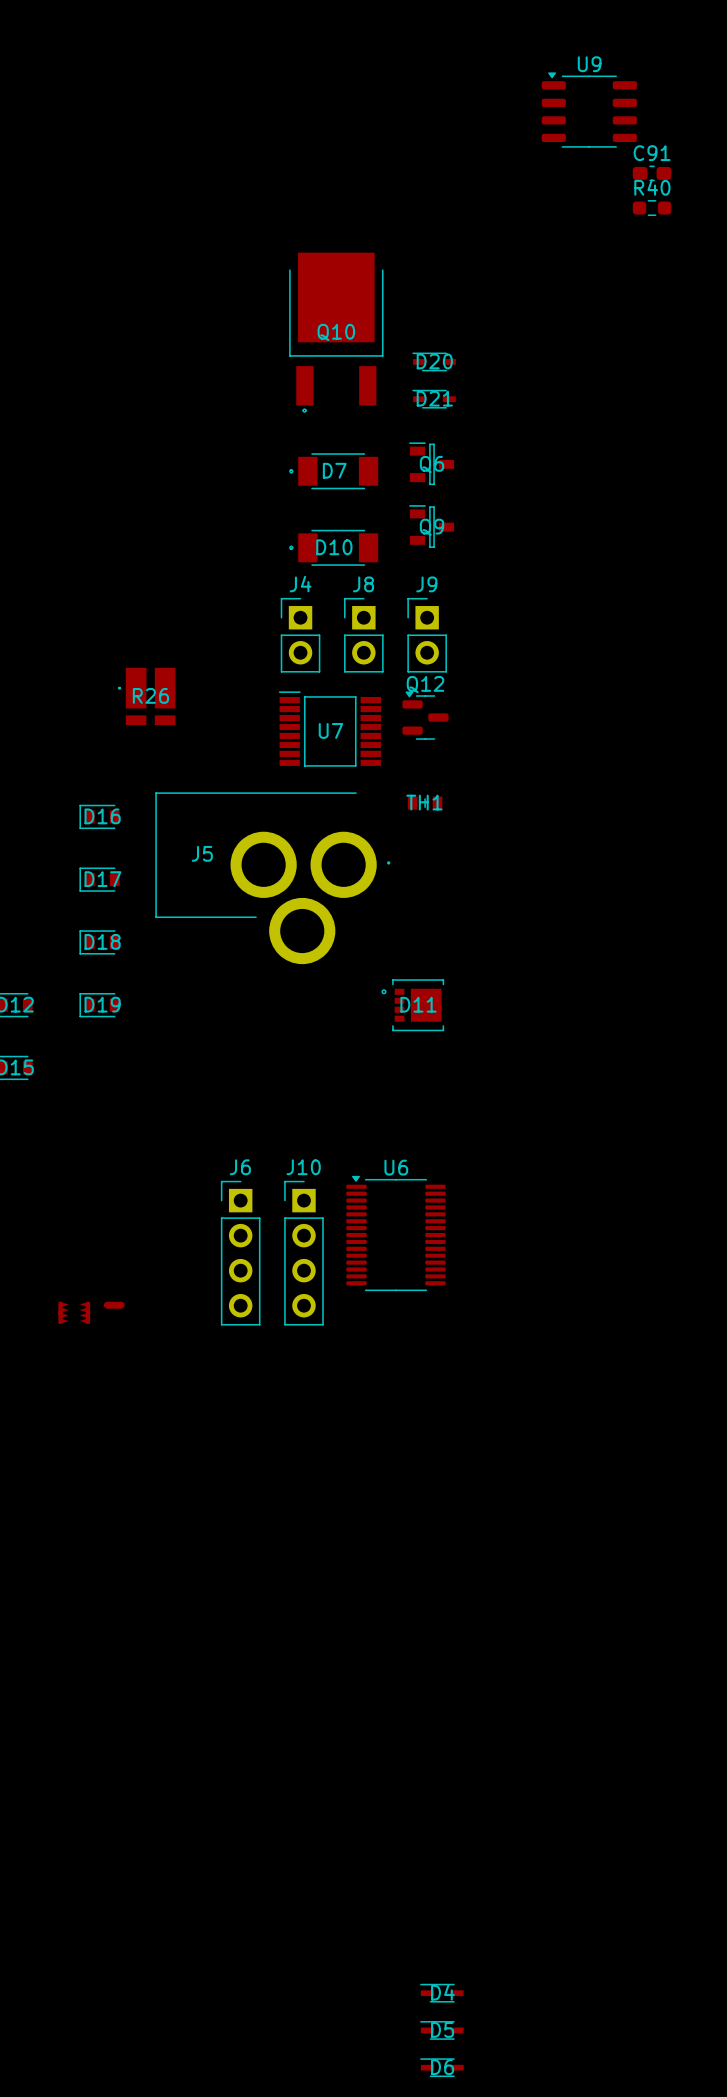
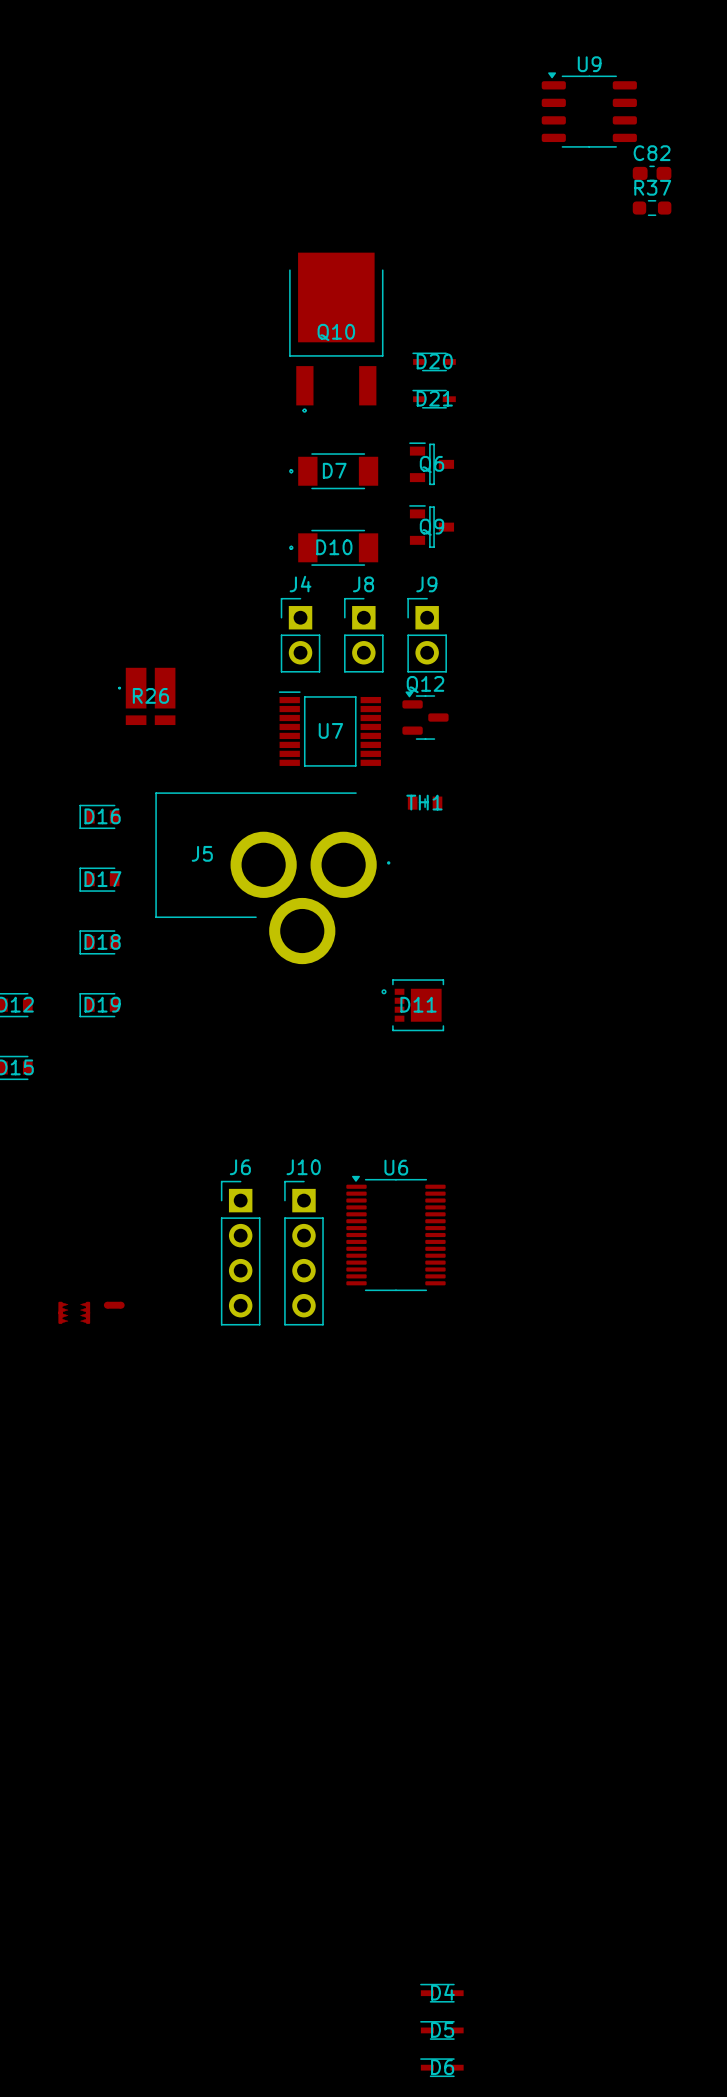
C91 name: C91 (652, 153) -> C82 (652, 153)
R40 name: R40 (652, 187) -> R37 (652, 187)

